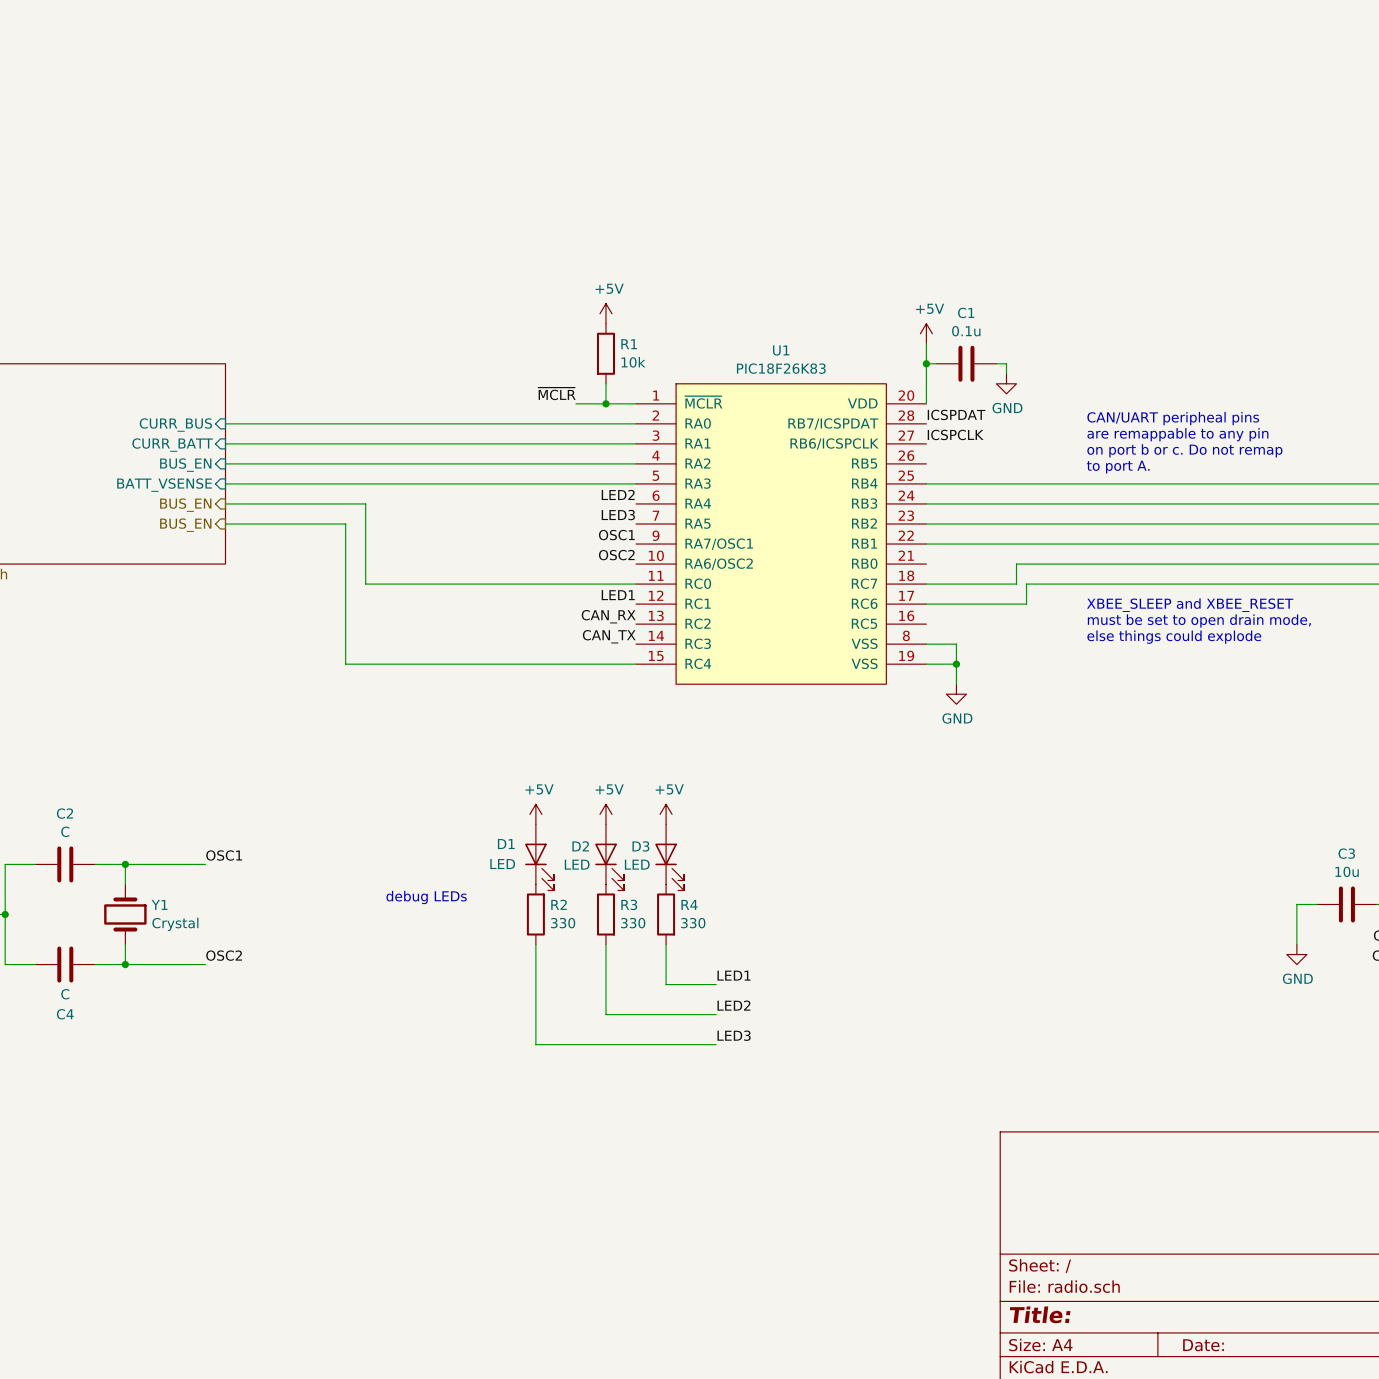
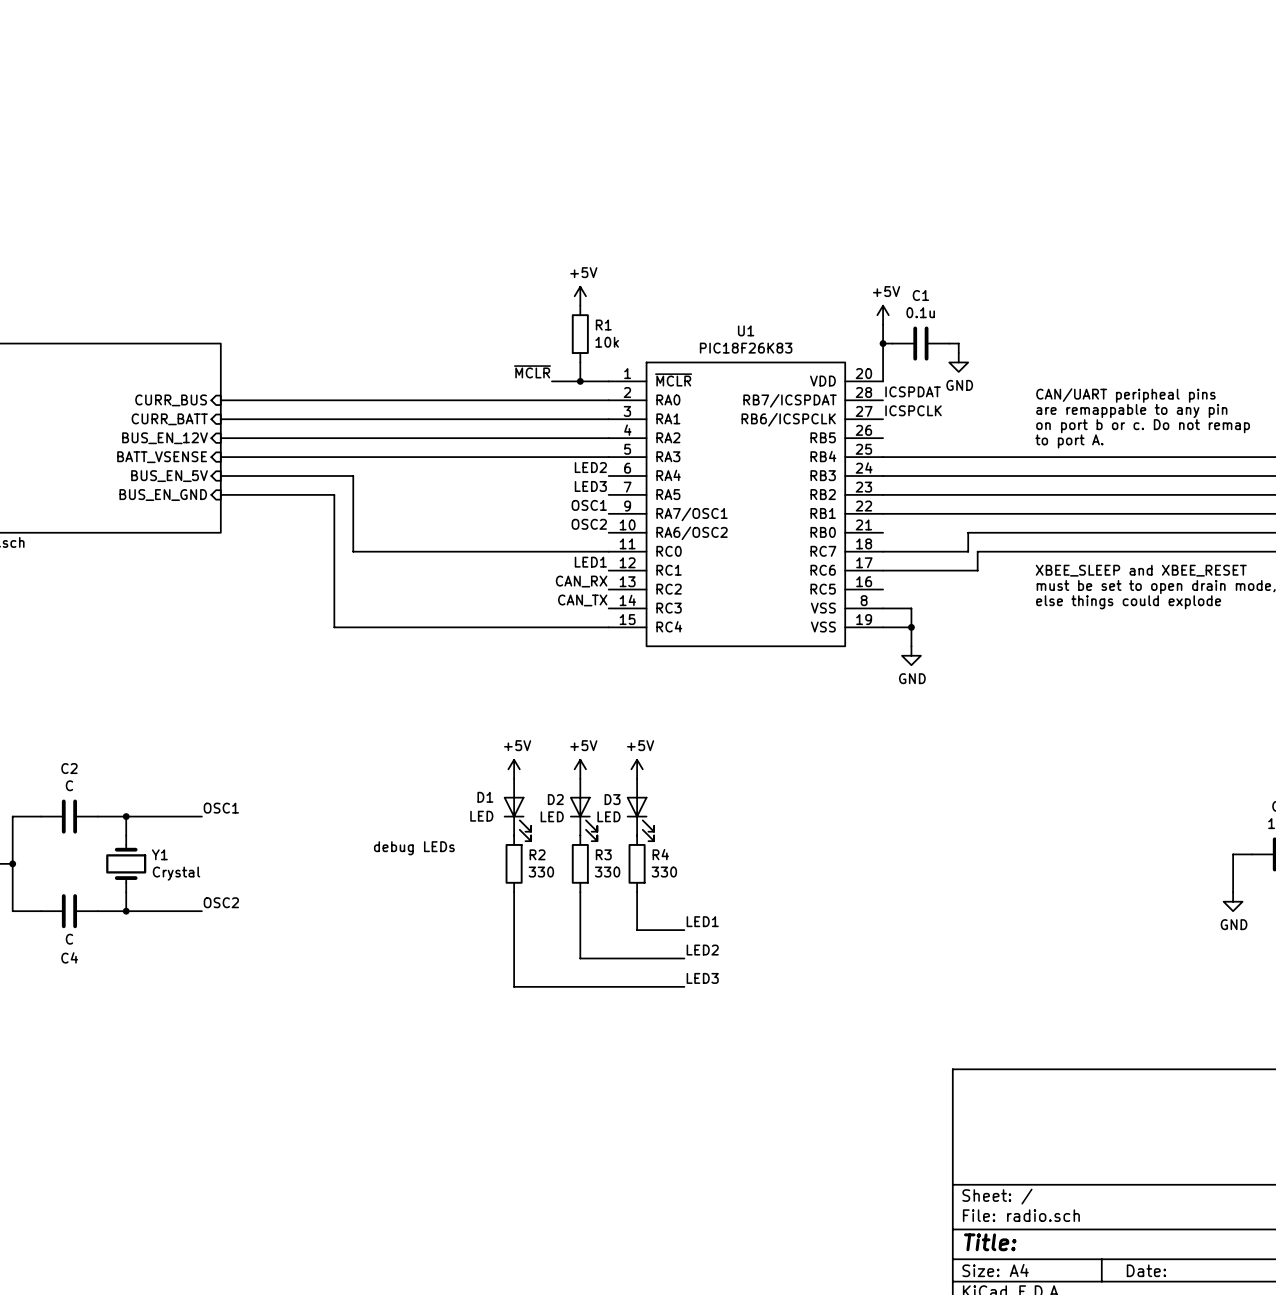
sheet pin: BUS_EN (185, 465) -> BUS_EN_12V (165, 438)
sheet pin: none -> BUS_EN_5V (169, 476)
hierarchical label: BUS_EN (185, 505) -> none
sheet pin: none -> BUS_EN_GND (163, 495)
hierarchical label: BUS_EN (185, 525) -> none

